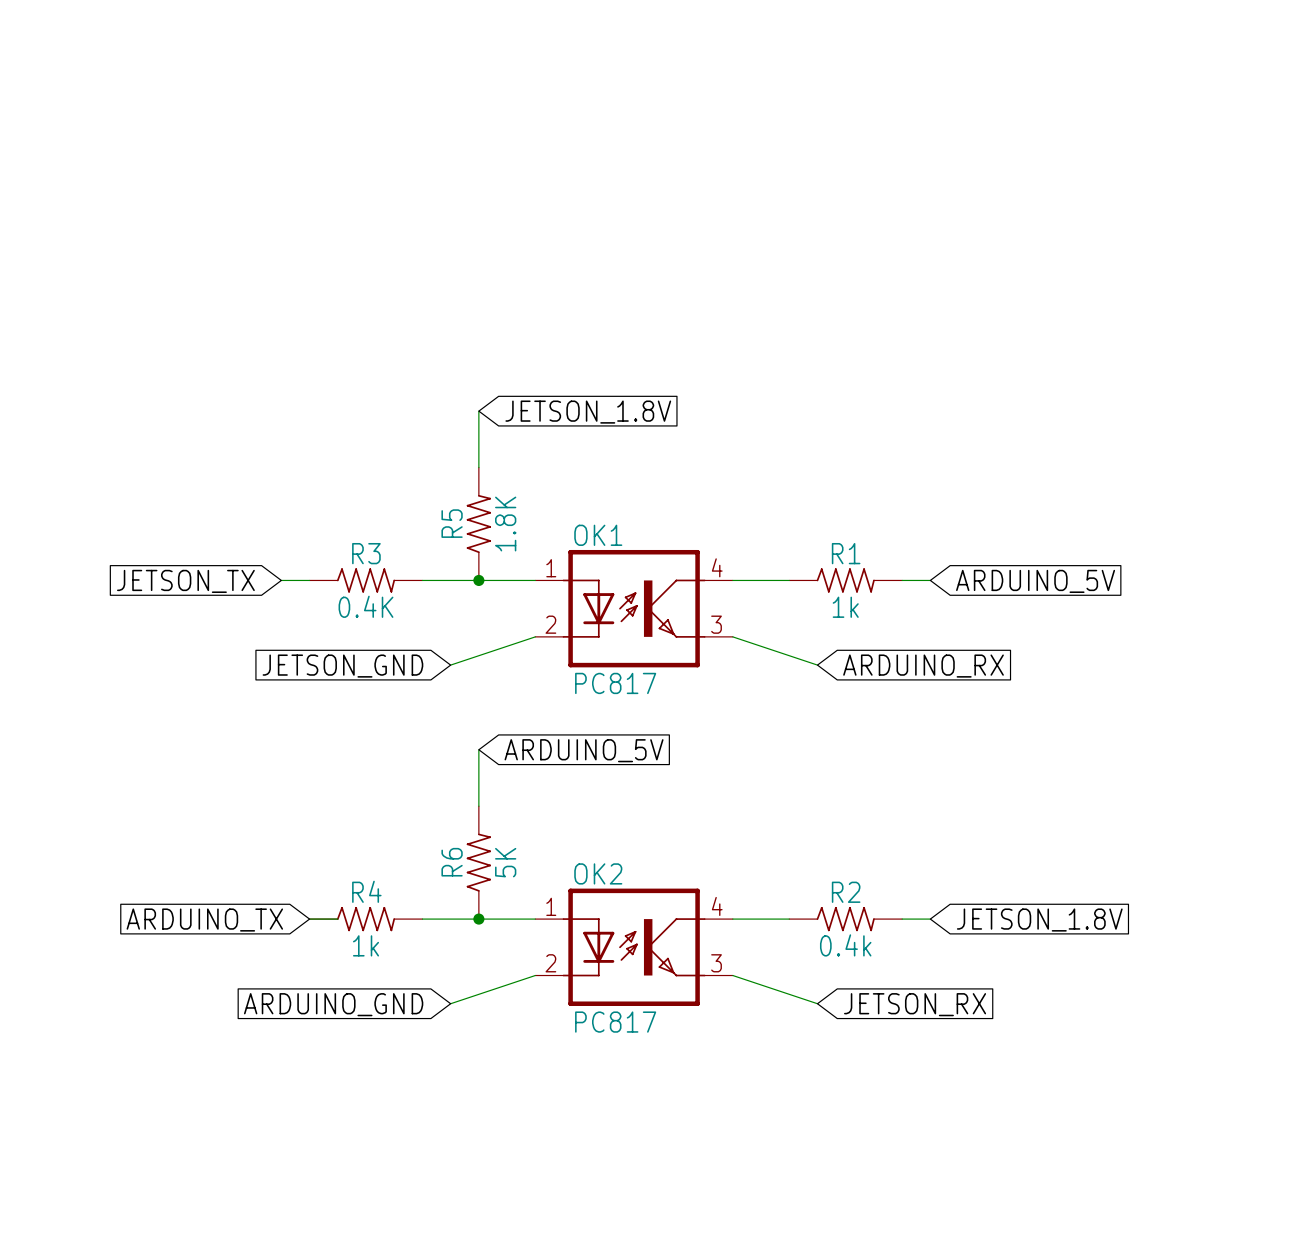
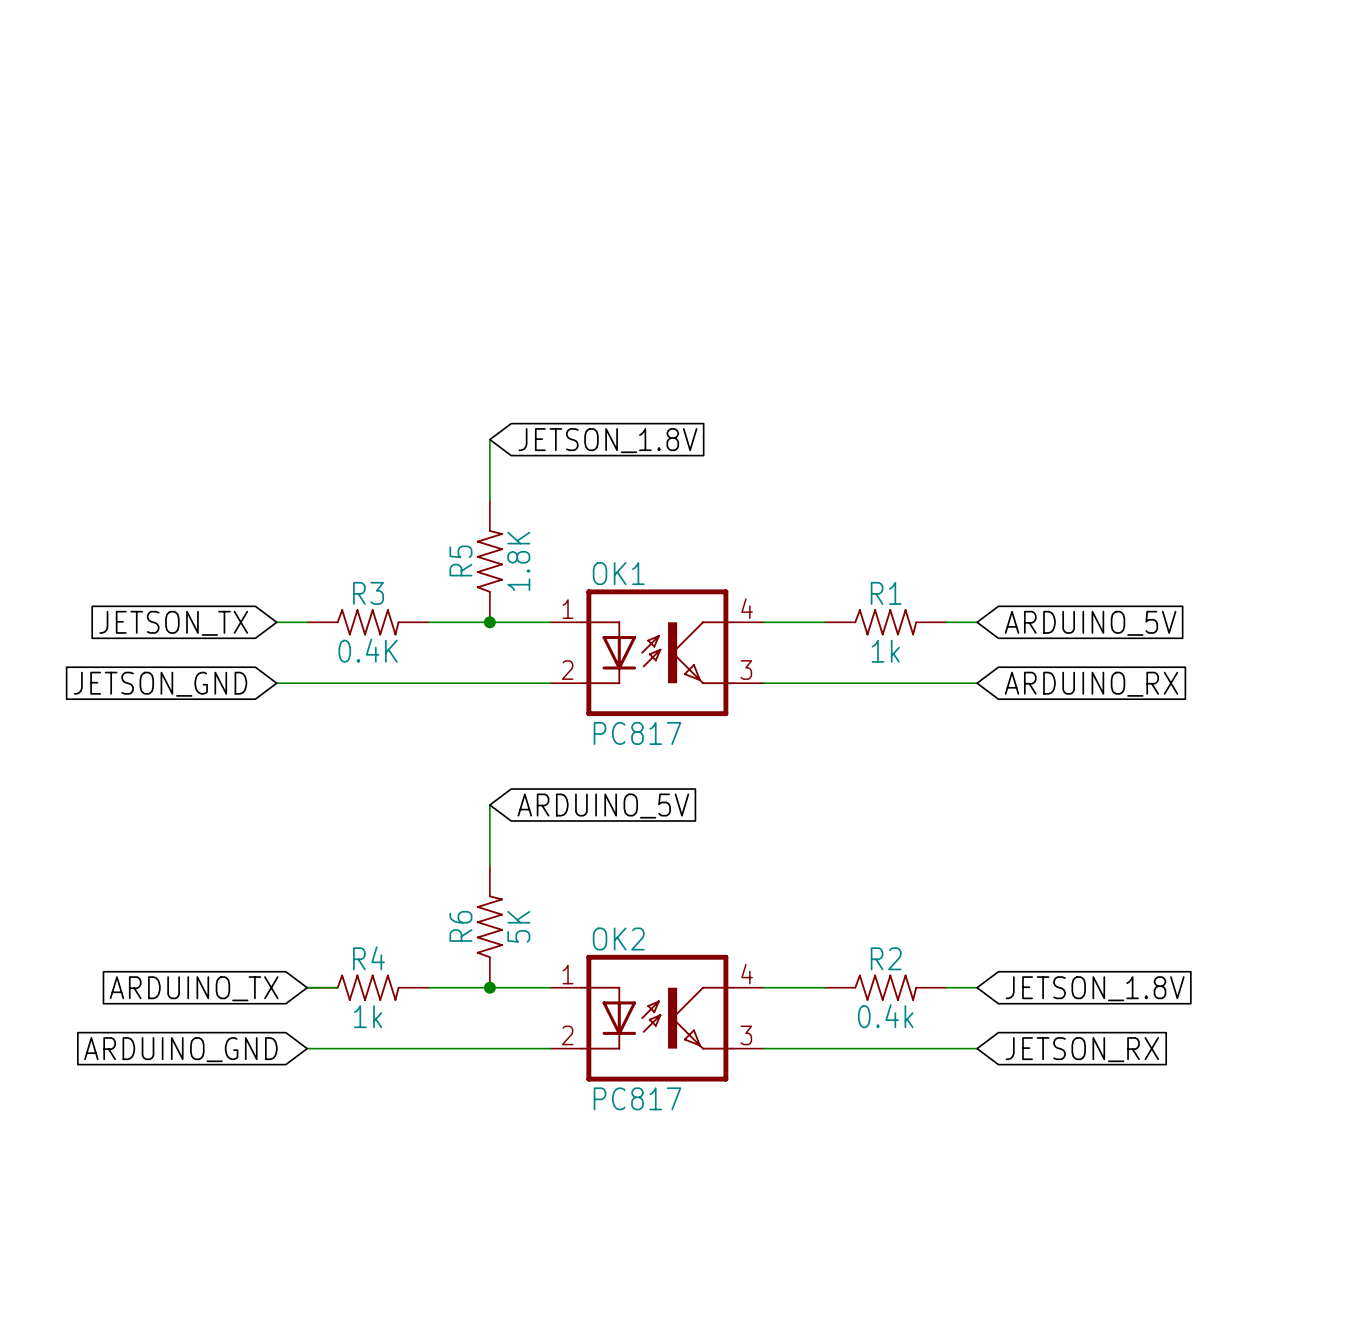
wire: (535, 636) (450, 665) -> (550, 683) (276, 683)
wire: (732, 636) (817, 665) -> (763, 683) (977, 683)
global label position: JETSON_GND (342, 666) -> JETSON_GND (160, 684)
global label position: ARDUINO_RX (923, 666) -> ARDUINO_RX (1091, 684)
wire: (535, 975) (450, 1003) -> (550, 1048) (307, 1048)
wire: (732, 975) (817, 1003) -> (763, 1048) (977, 1048)
global label position: ARDUINO_GND (333, 1004) -> ARDUINO_GND (180, 1049)
global label position: JETSON_RX (915, 1004) -> JETSON_RX (1082, 1049)

